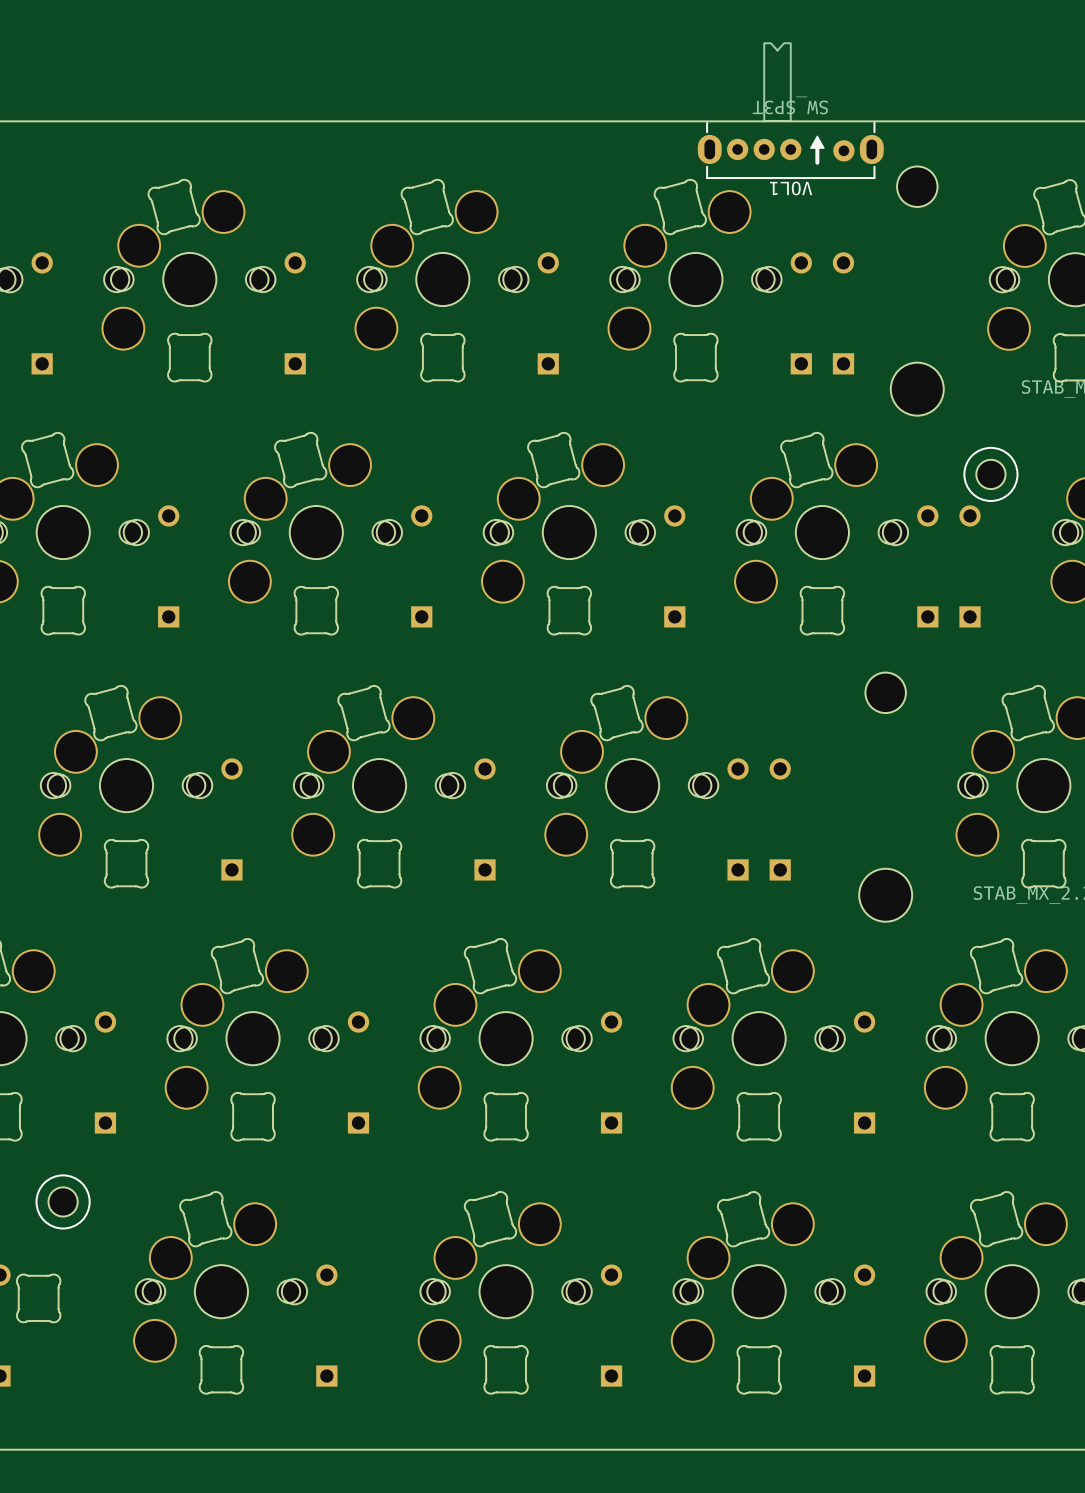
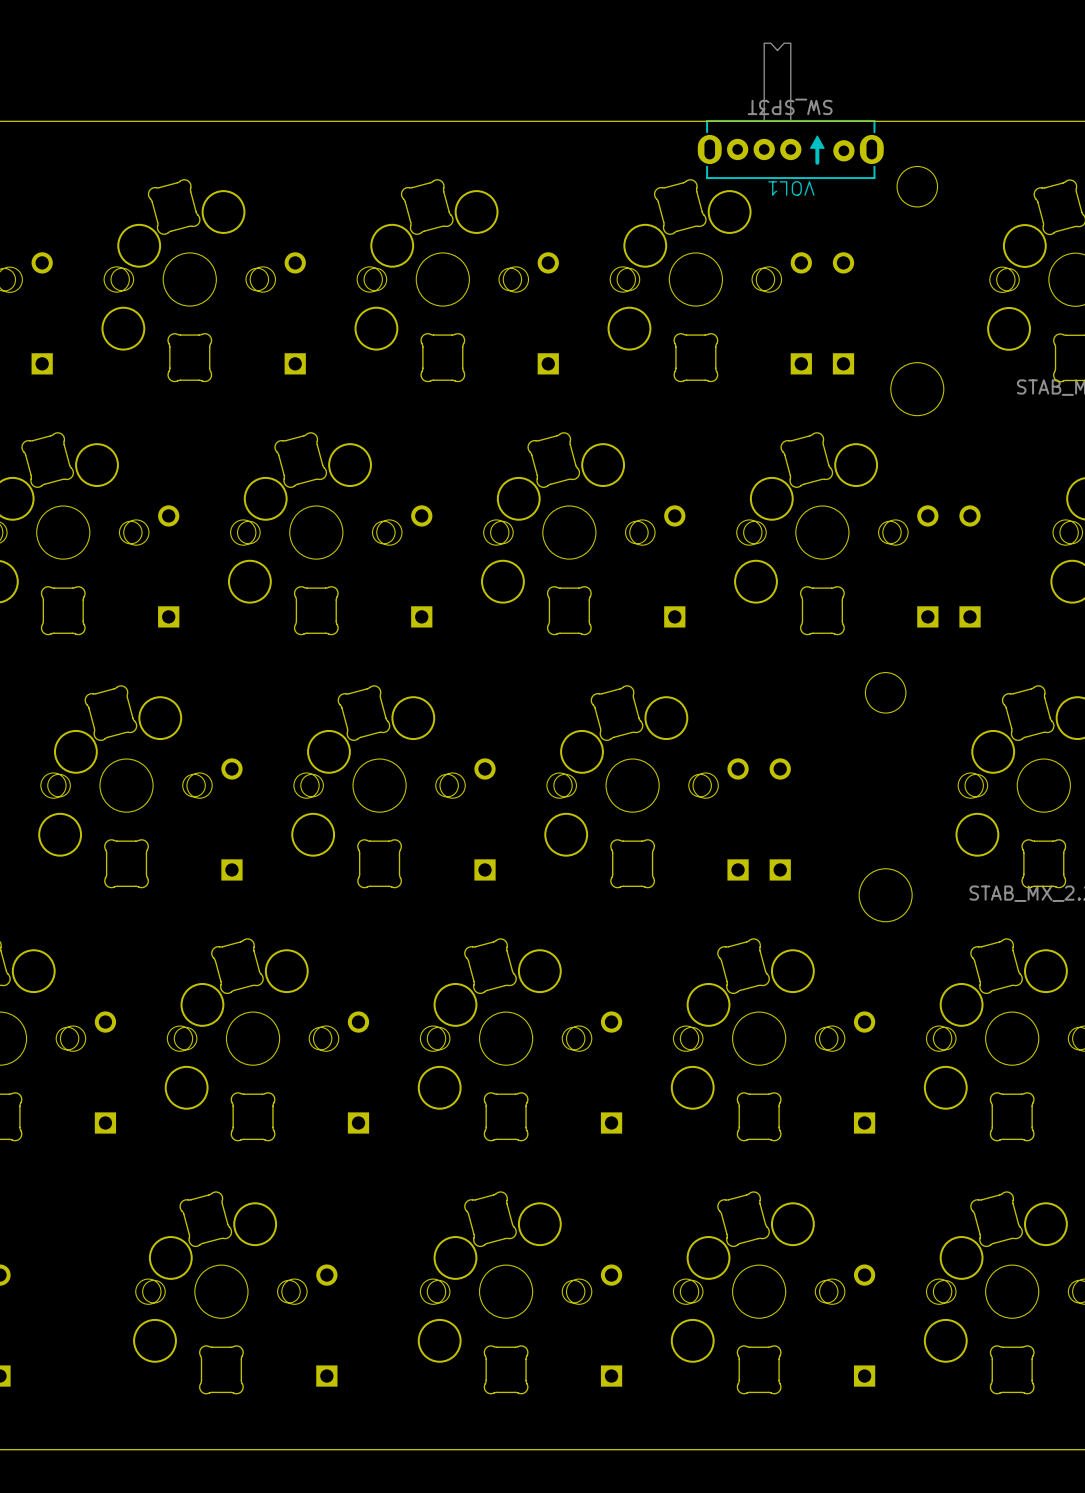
VOL1 footprint: [697, 42, 884, 180] -> [697, 42, 884, 180]
part: (990, 474) -> none
part: (63, 1201) -> none
part: (38, 1298) -> none

